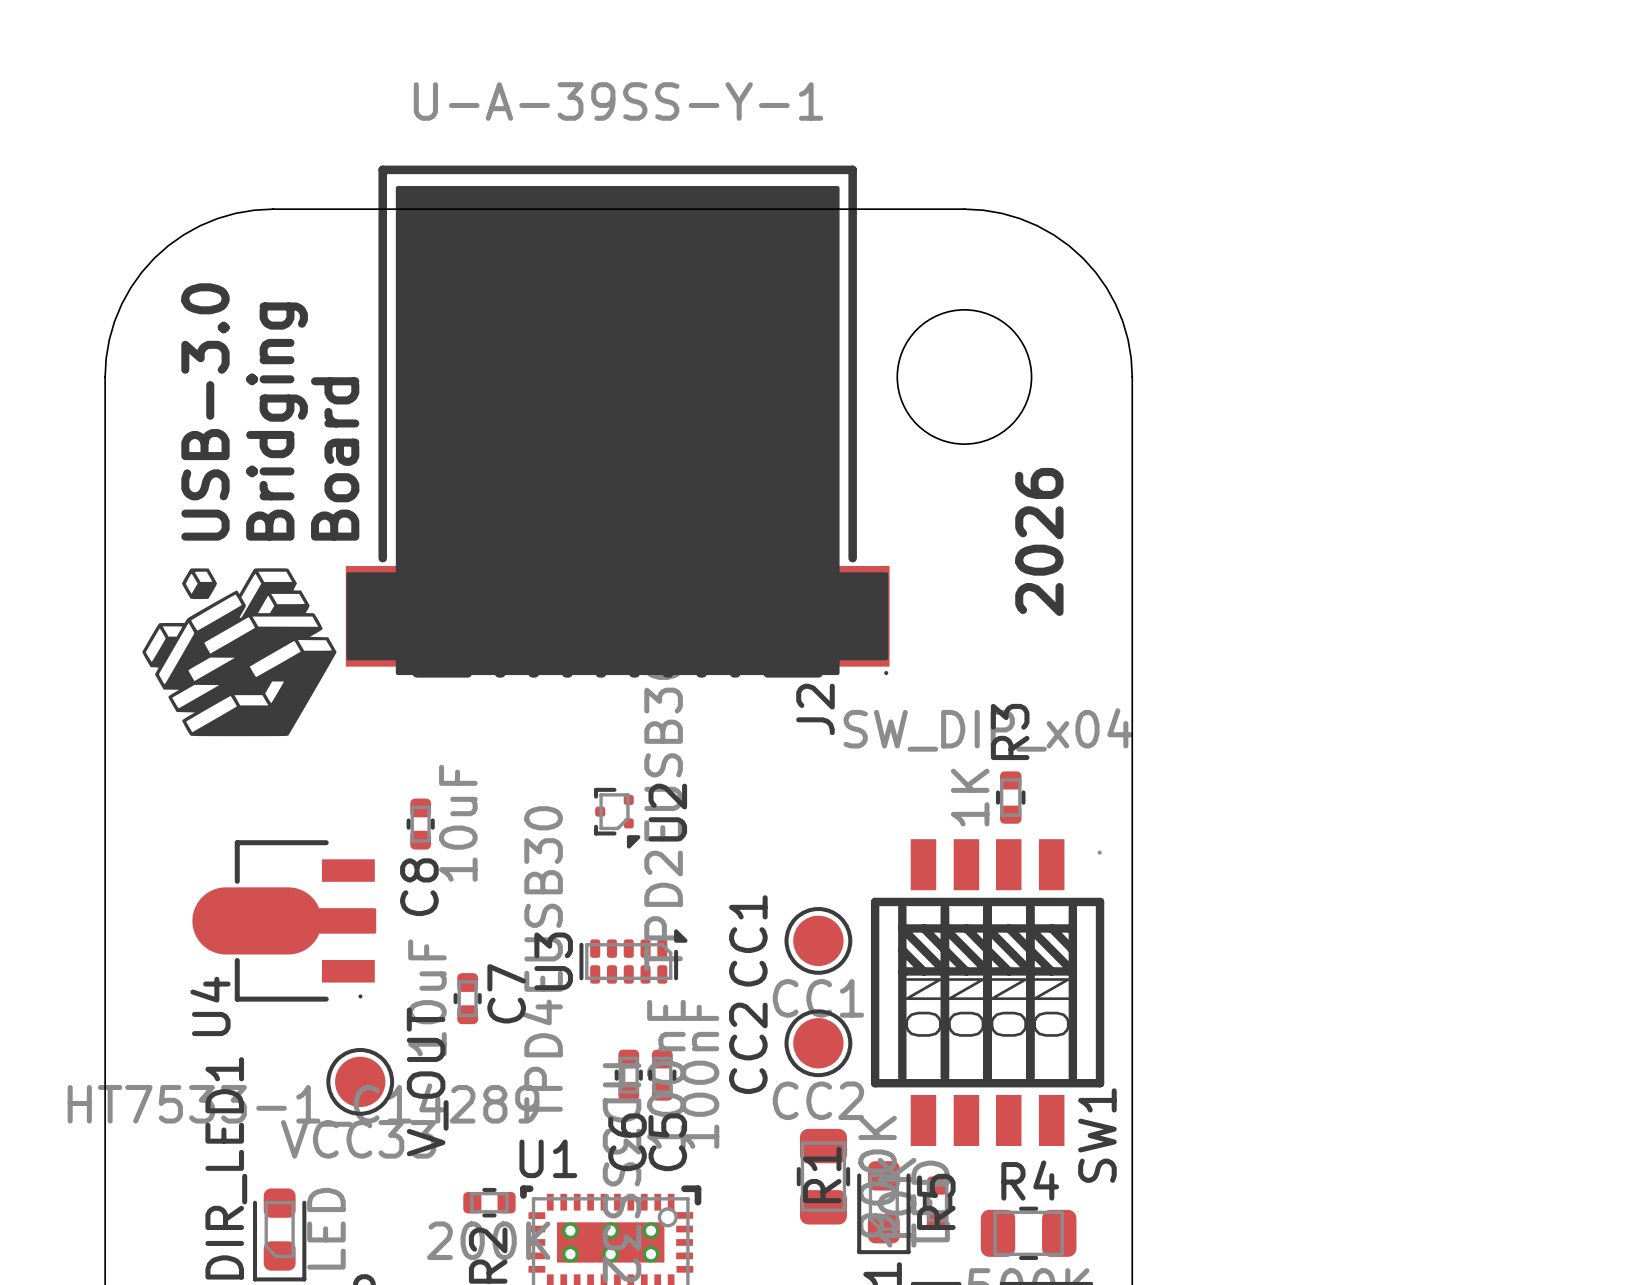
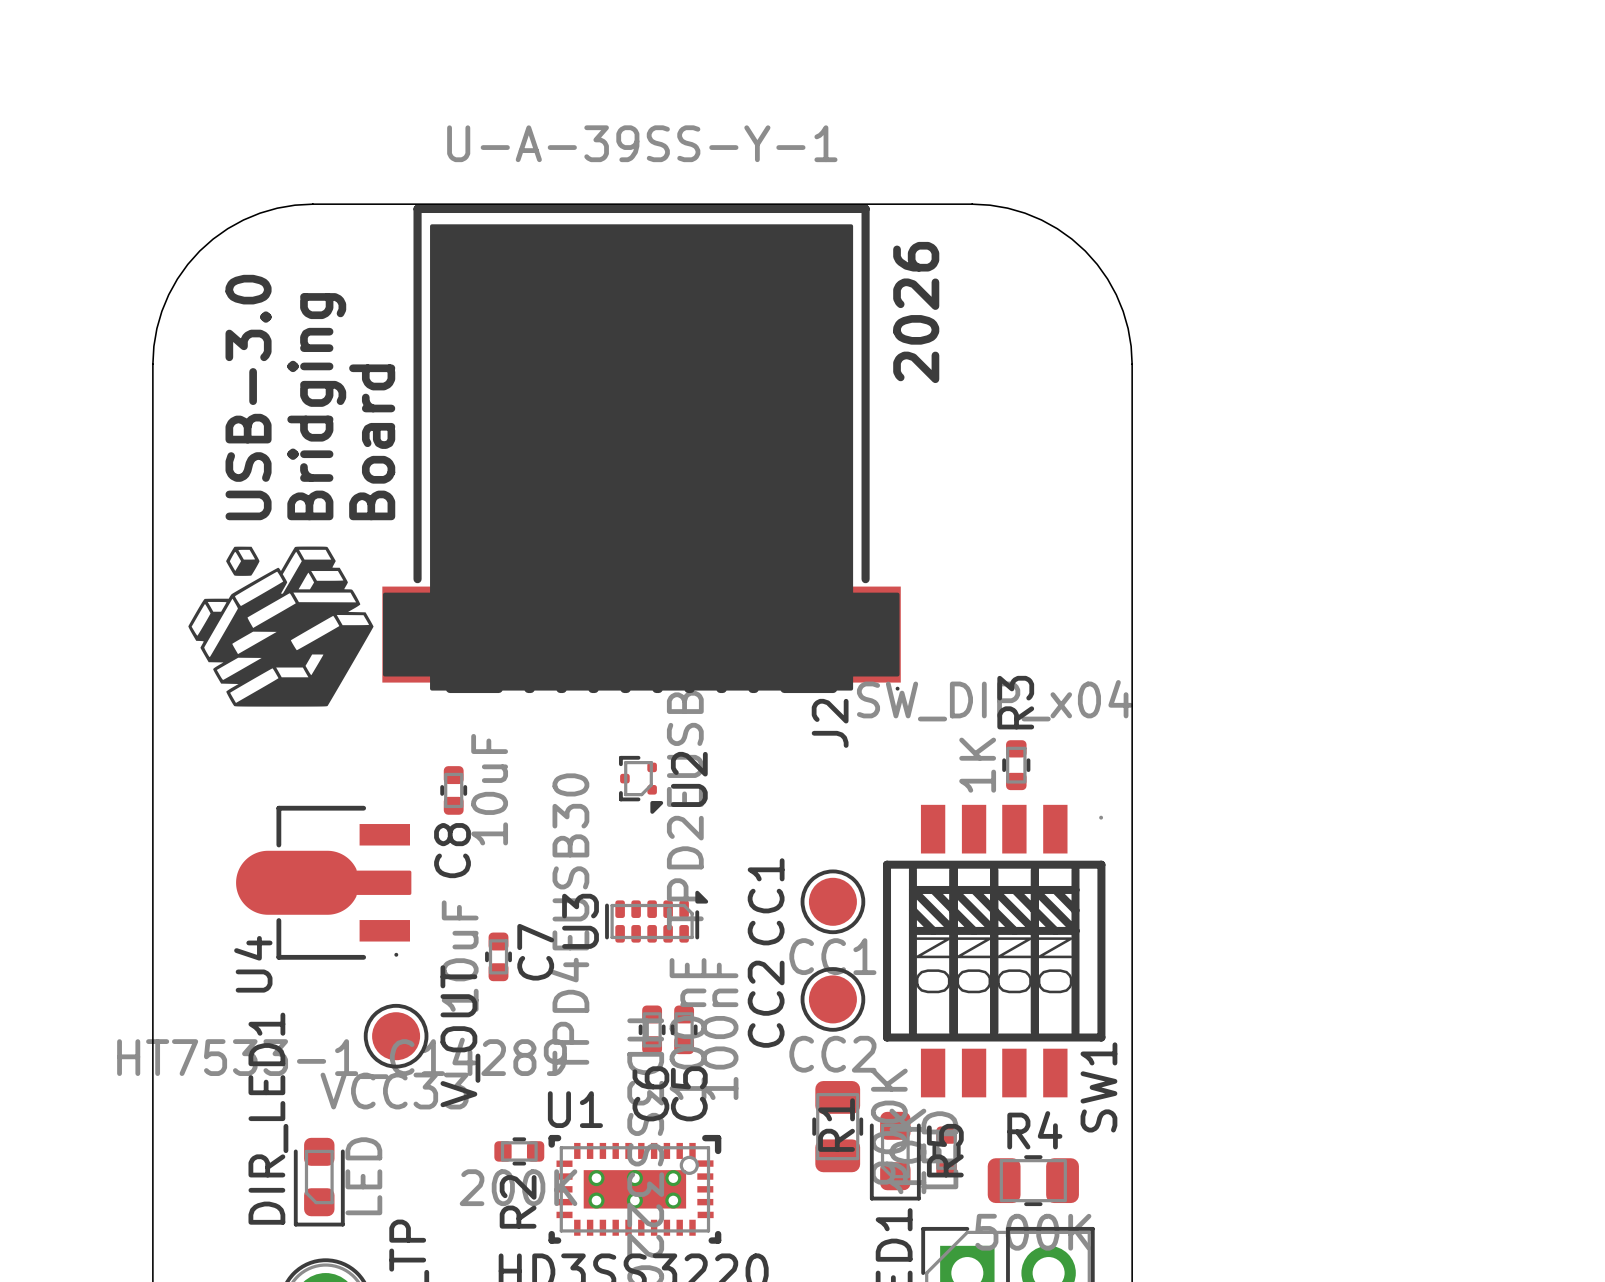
round board edge: [896, 309, 1033, 445] -> none
J2 position: (617, 421) -> (641, 448)
text position: 2026 (1039, 541) -> 2026 (916, 312)

